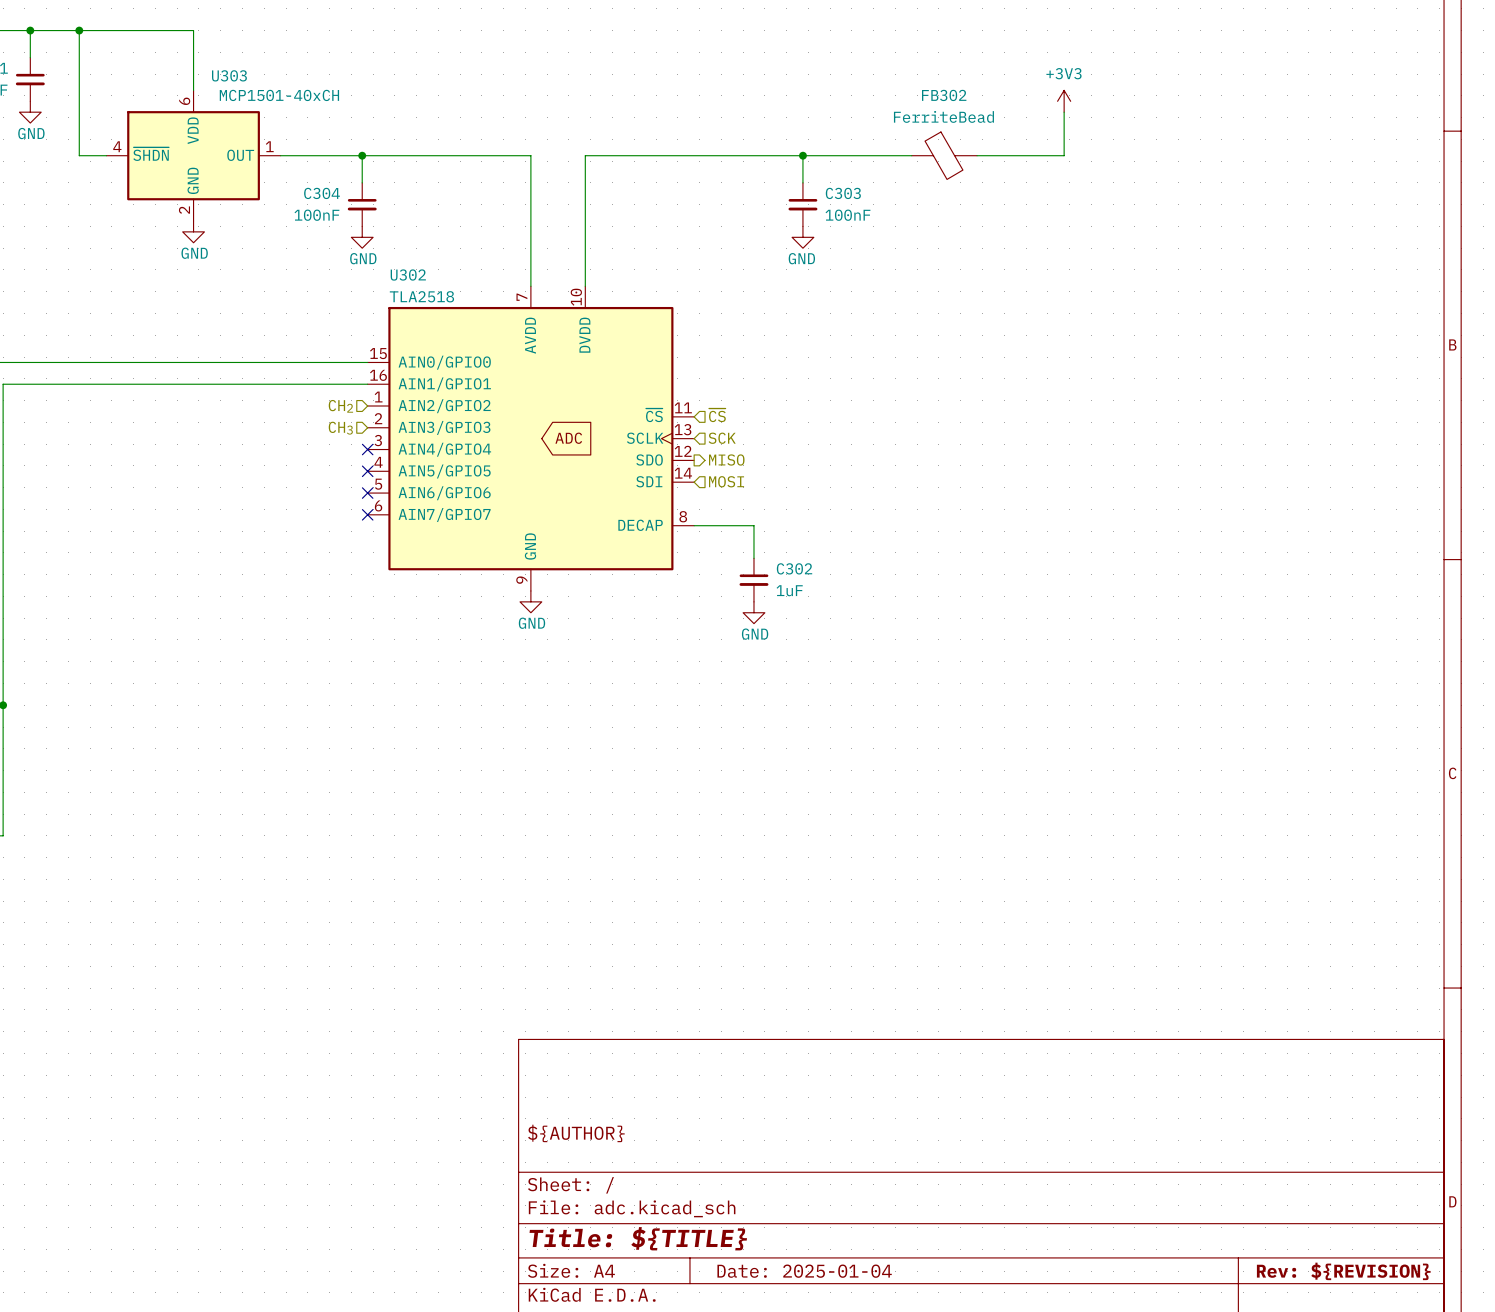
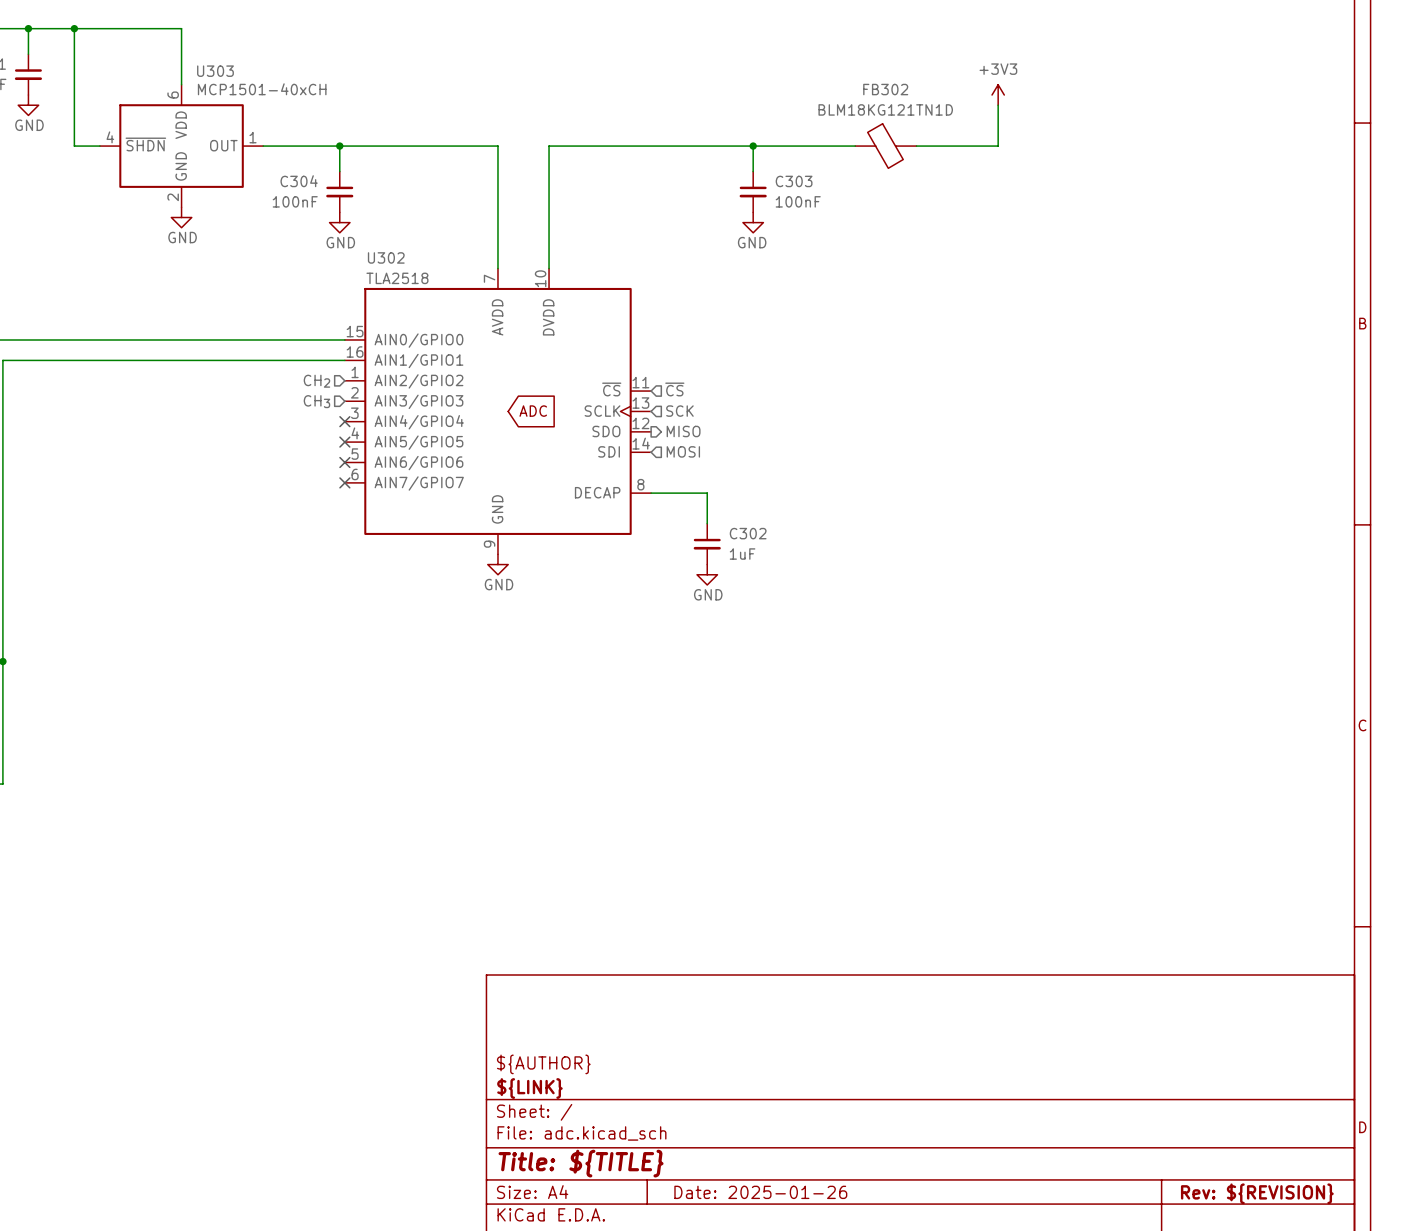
FB302 value: FerriteBead (943, 116) -> BLM18KG121TN1D (885, 109)
title block: none -> ${LINK} (529, 1088)
title block: Date: 2025-01-04 (804, 1271) -> Date: 2025-01-26 (760, 1192)

